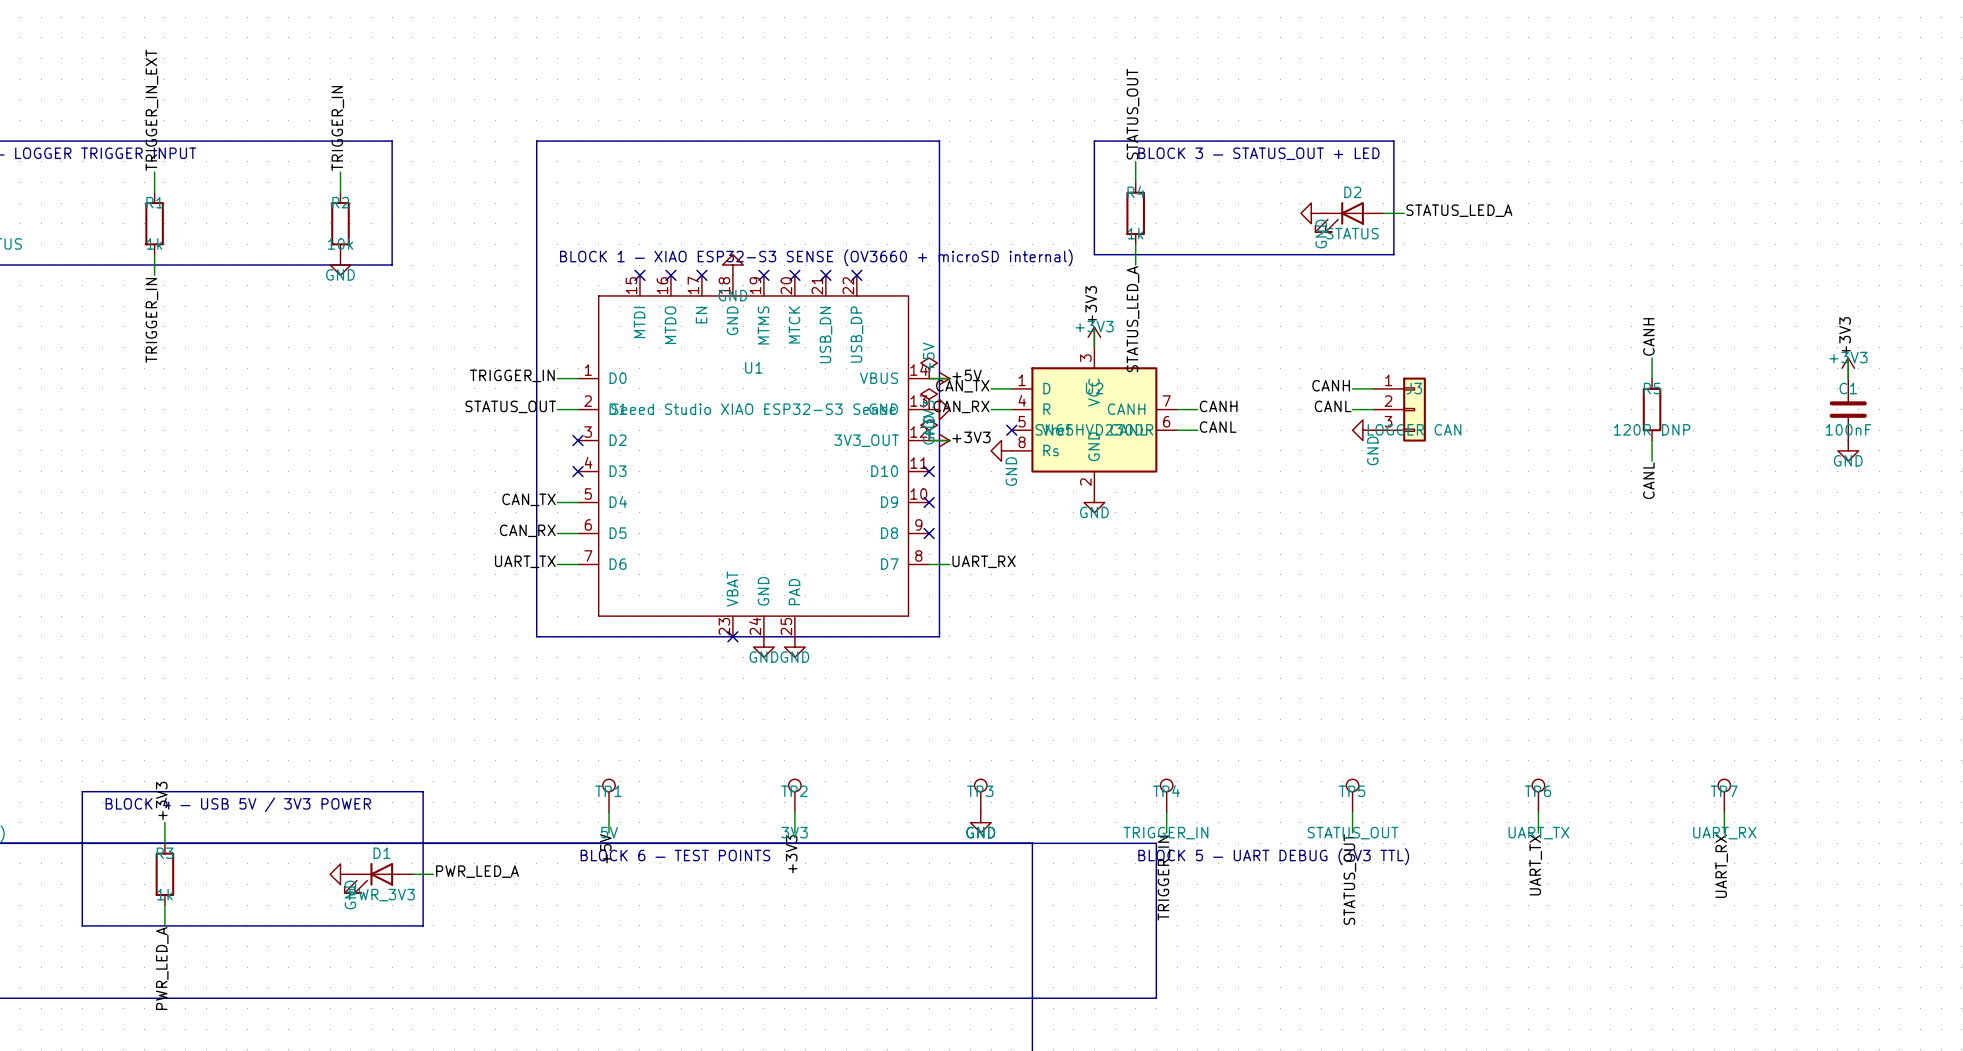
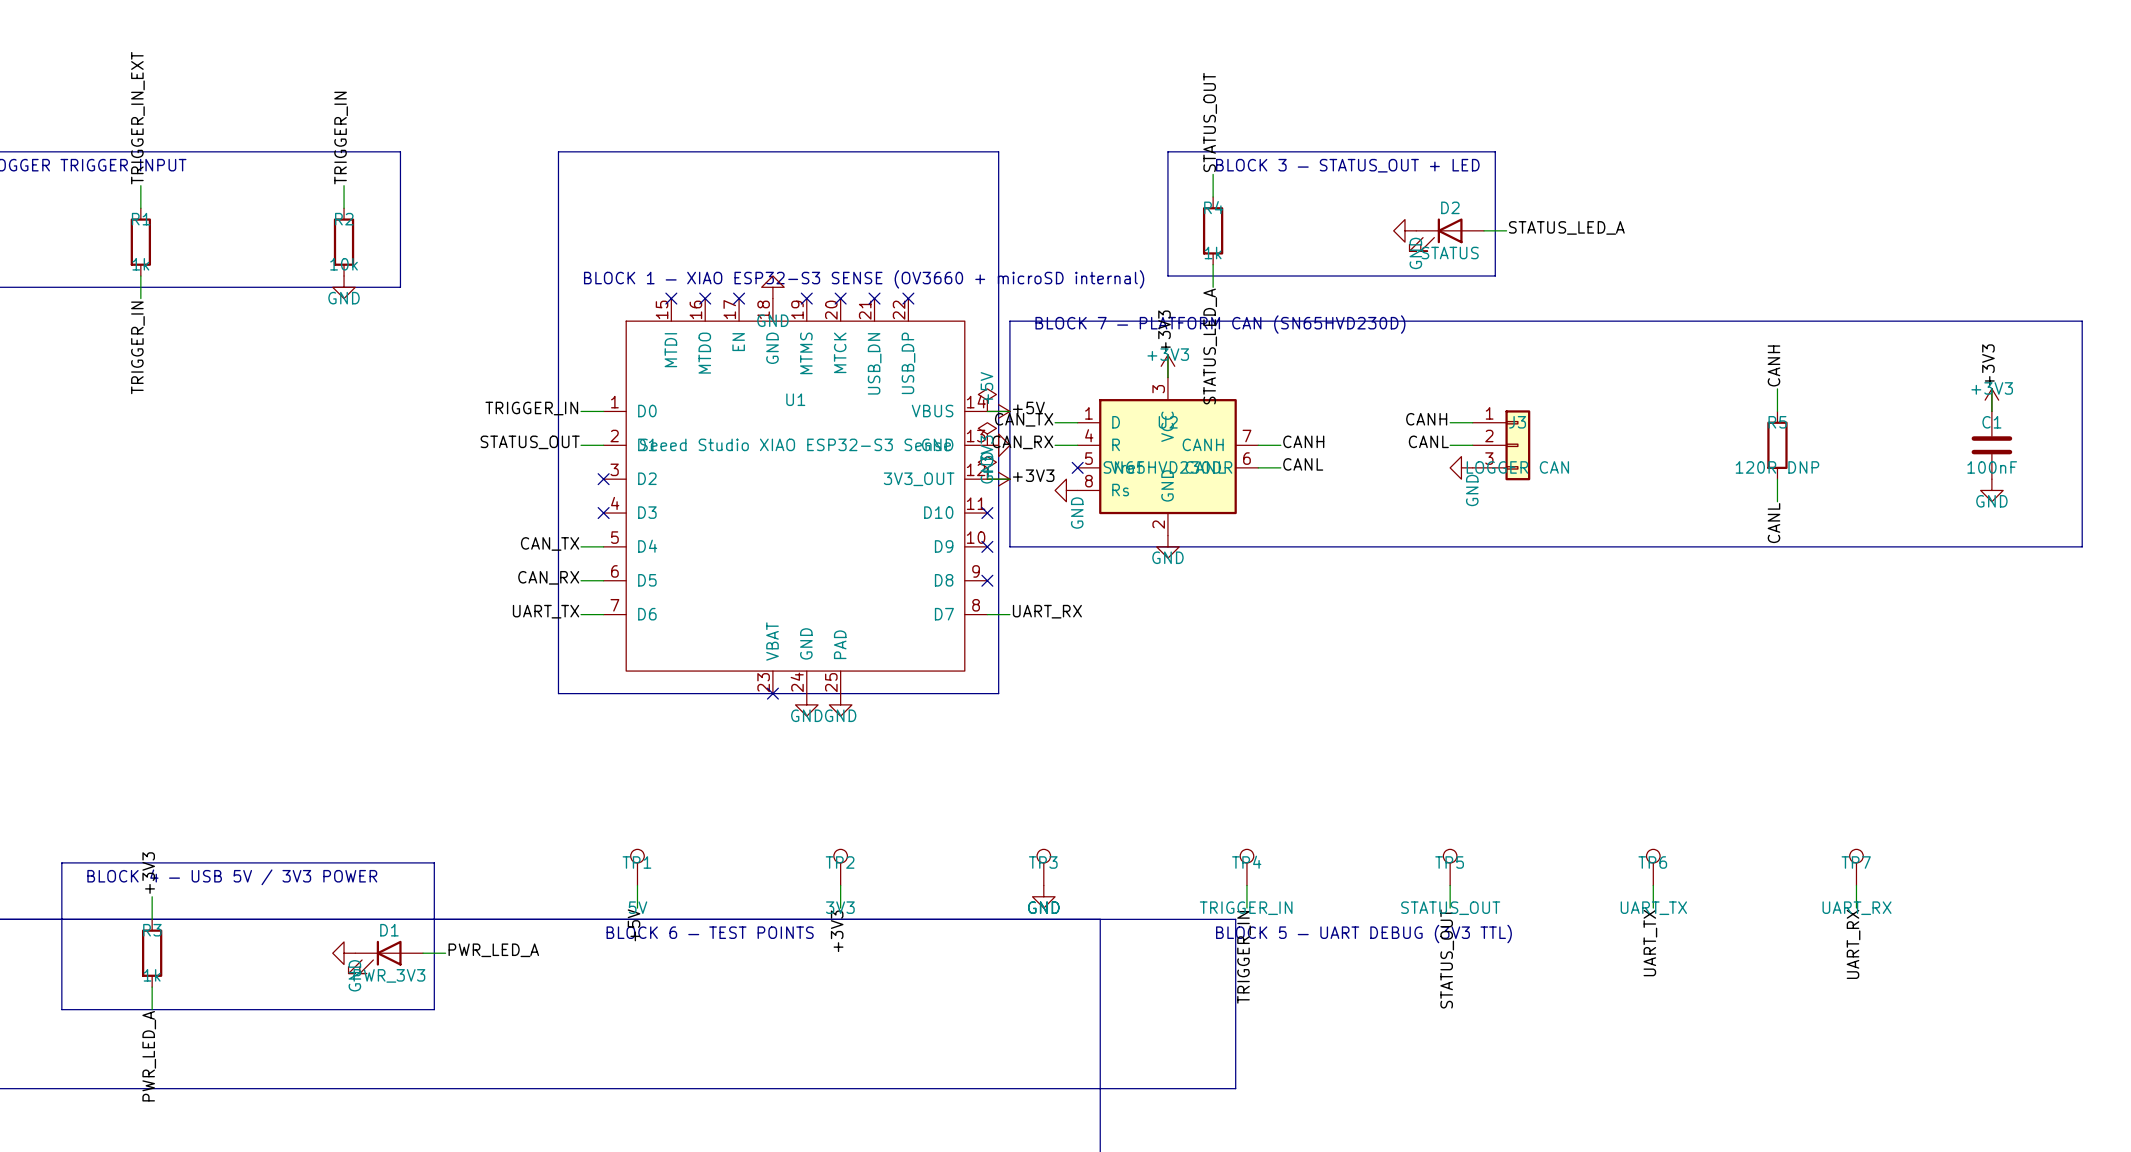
line: none -> (1009, 321) (2082, 321) (2082, 546) (1009, 546) (1009, 321)
text: none -> BLOCK 7 — PLATFORM CAN (SN65HVD230D) (1220, 324)

